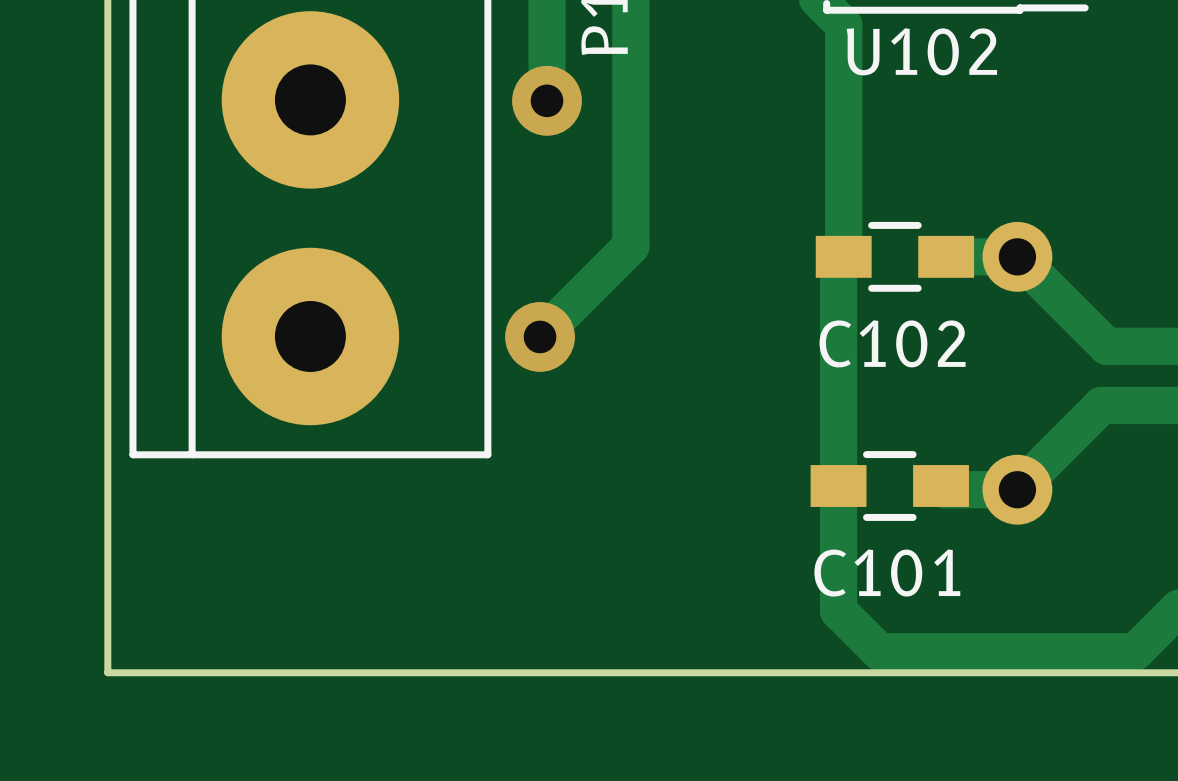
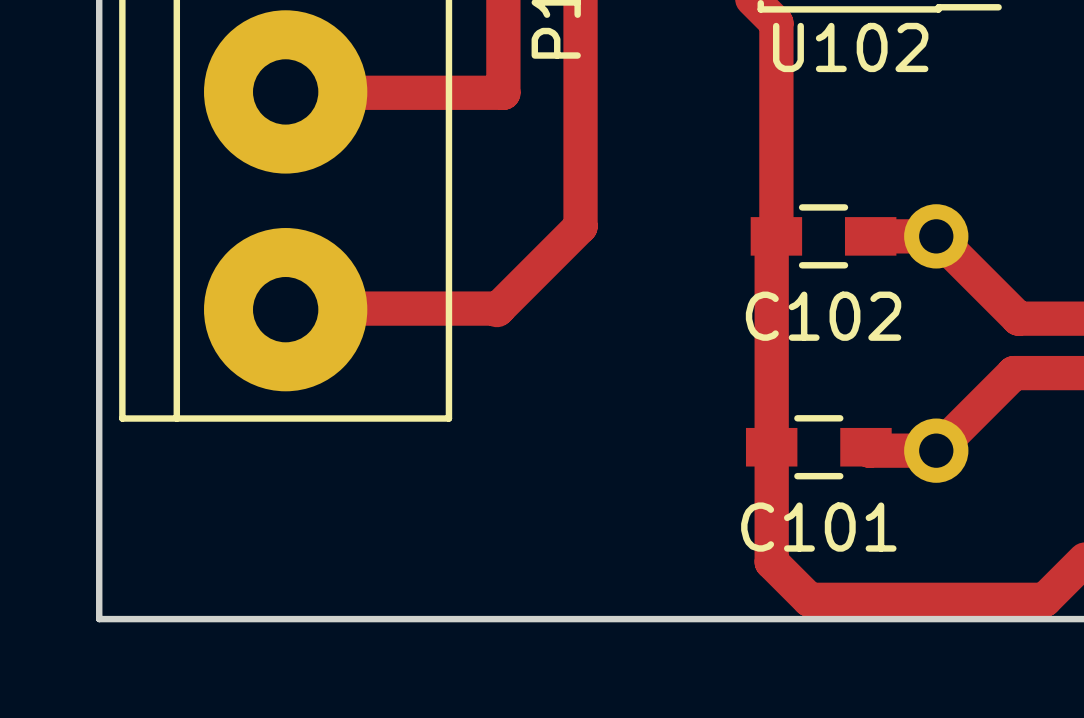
track: none -> (285, 91) (503, 92)
via: (547, 100) -> none
track: none -> (498, 308) (285, 309)
via: (540, 336) -> none

